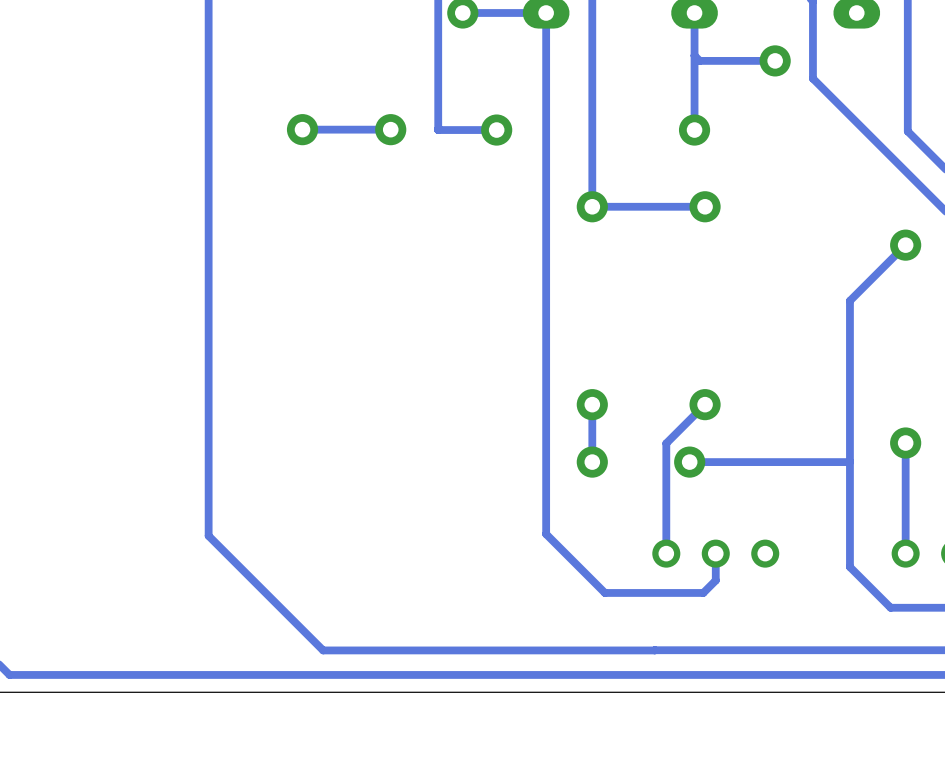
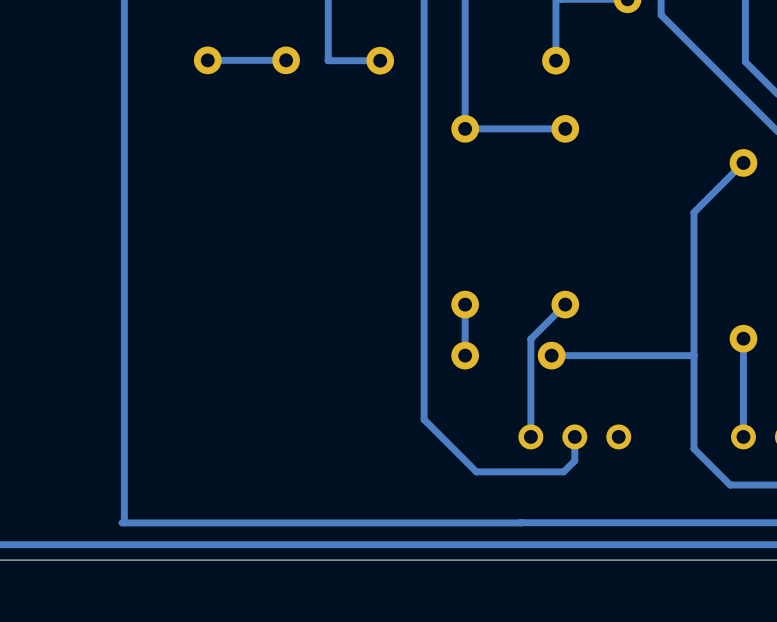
track: (208, 535) (323, 650) -> (124, 421) (124, 522)
track: none -> (226, 522) (121, 522)

